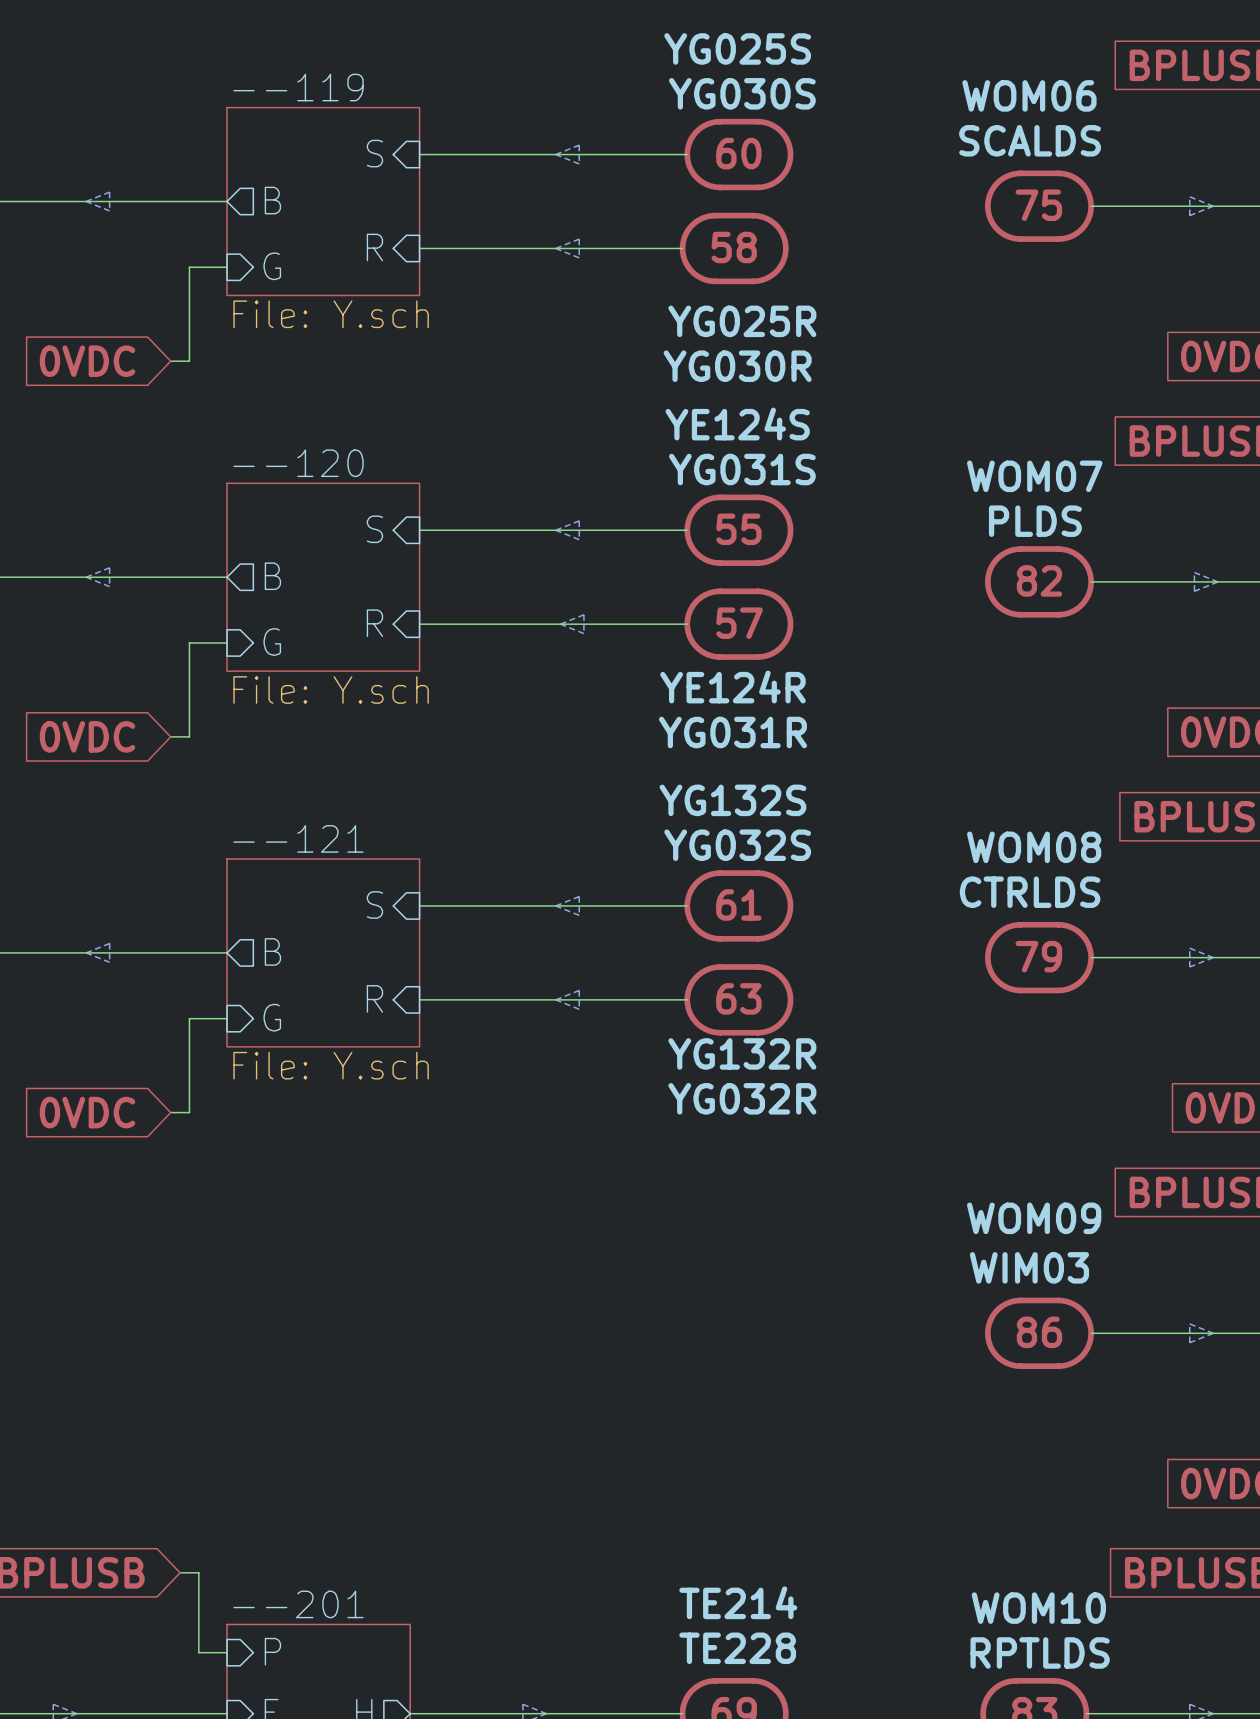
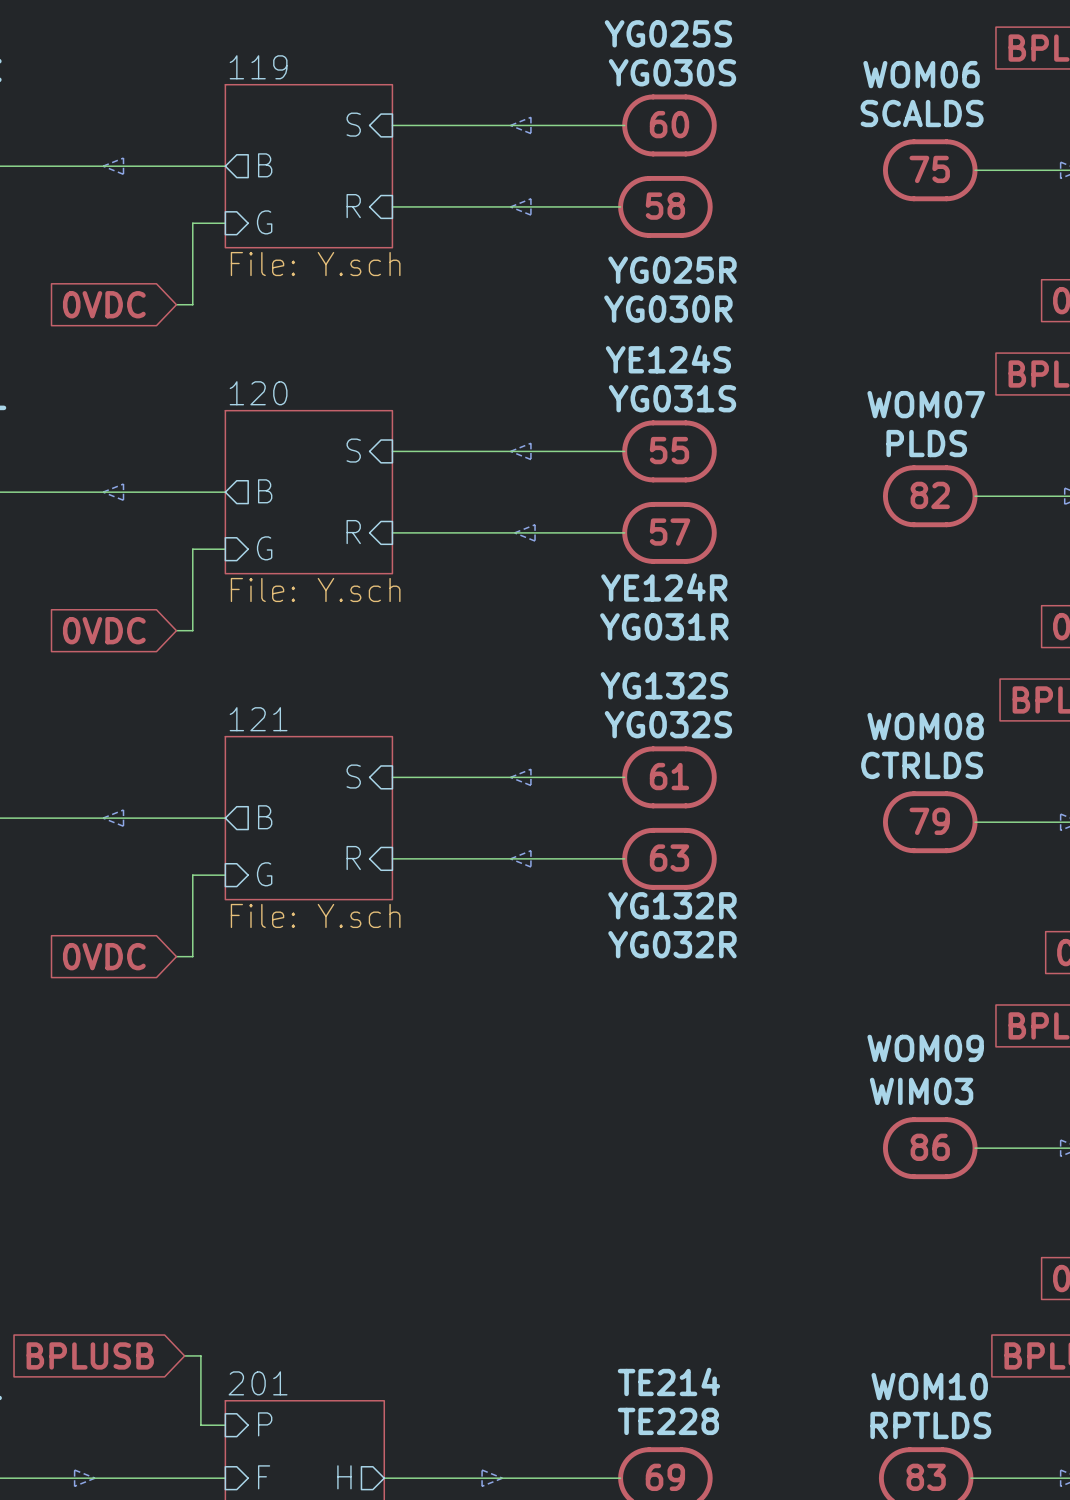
sheet --119 name: --119 (298, 87) -> 119 (258, 67)
sheet --120 name: --120 (298, 463) -> 120 (258, 393)
sheet --121 name: --121 (298, 838) -> 121 (258, 719)
sheet --201 name: --201 (298, 1604) -> 201 (258, 1383)

